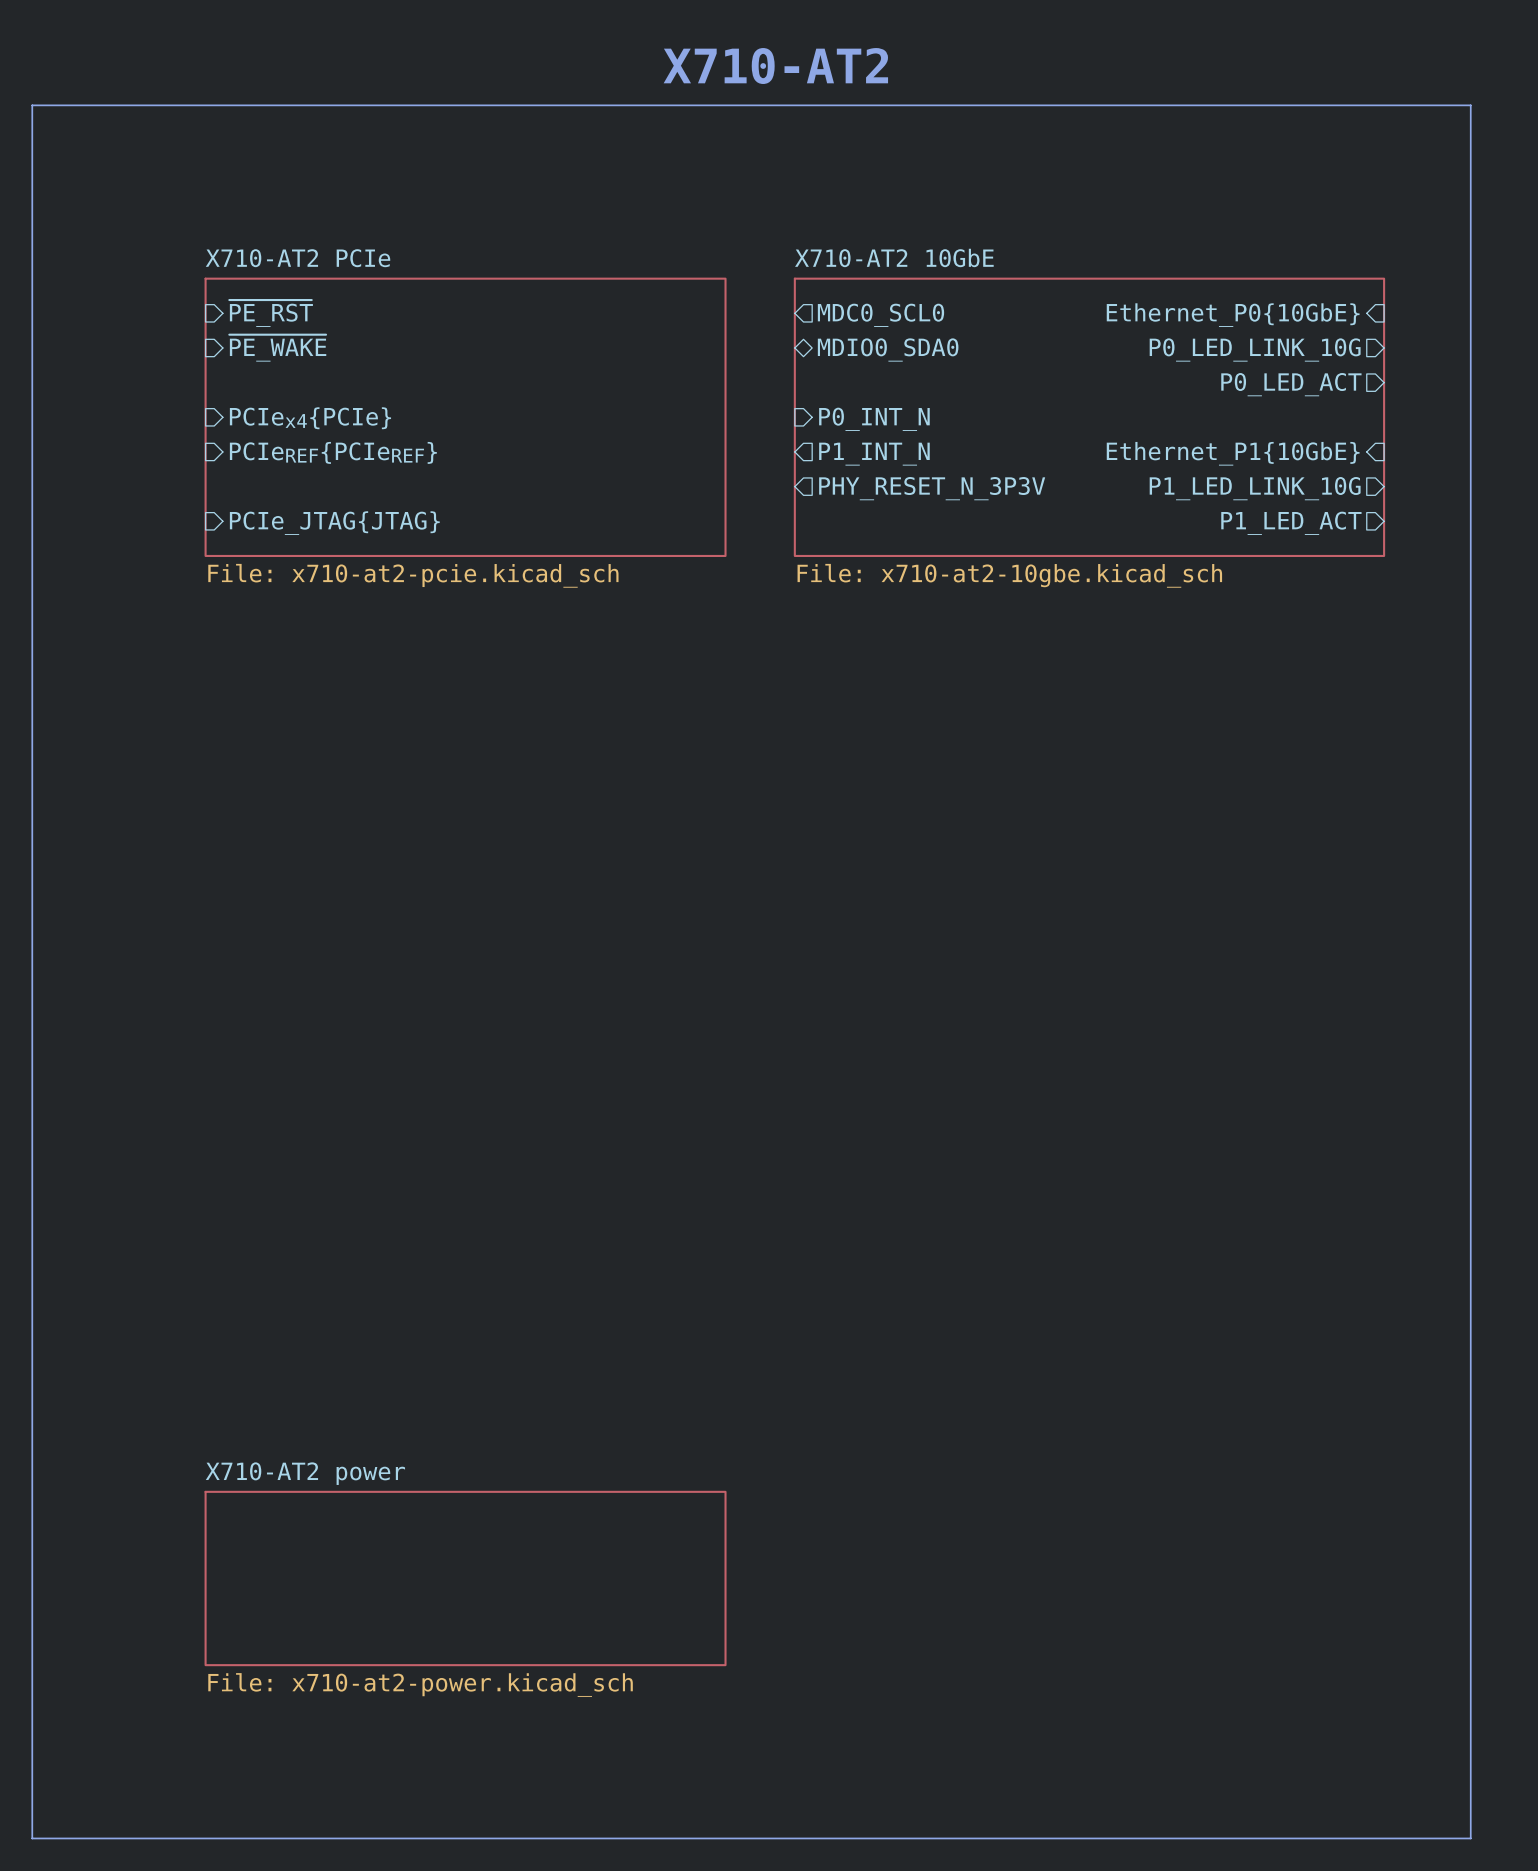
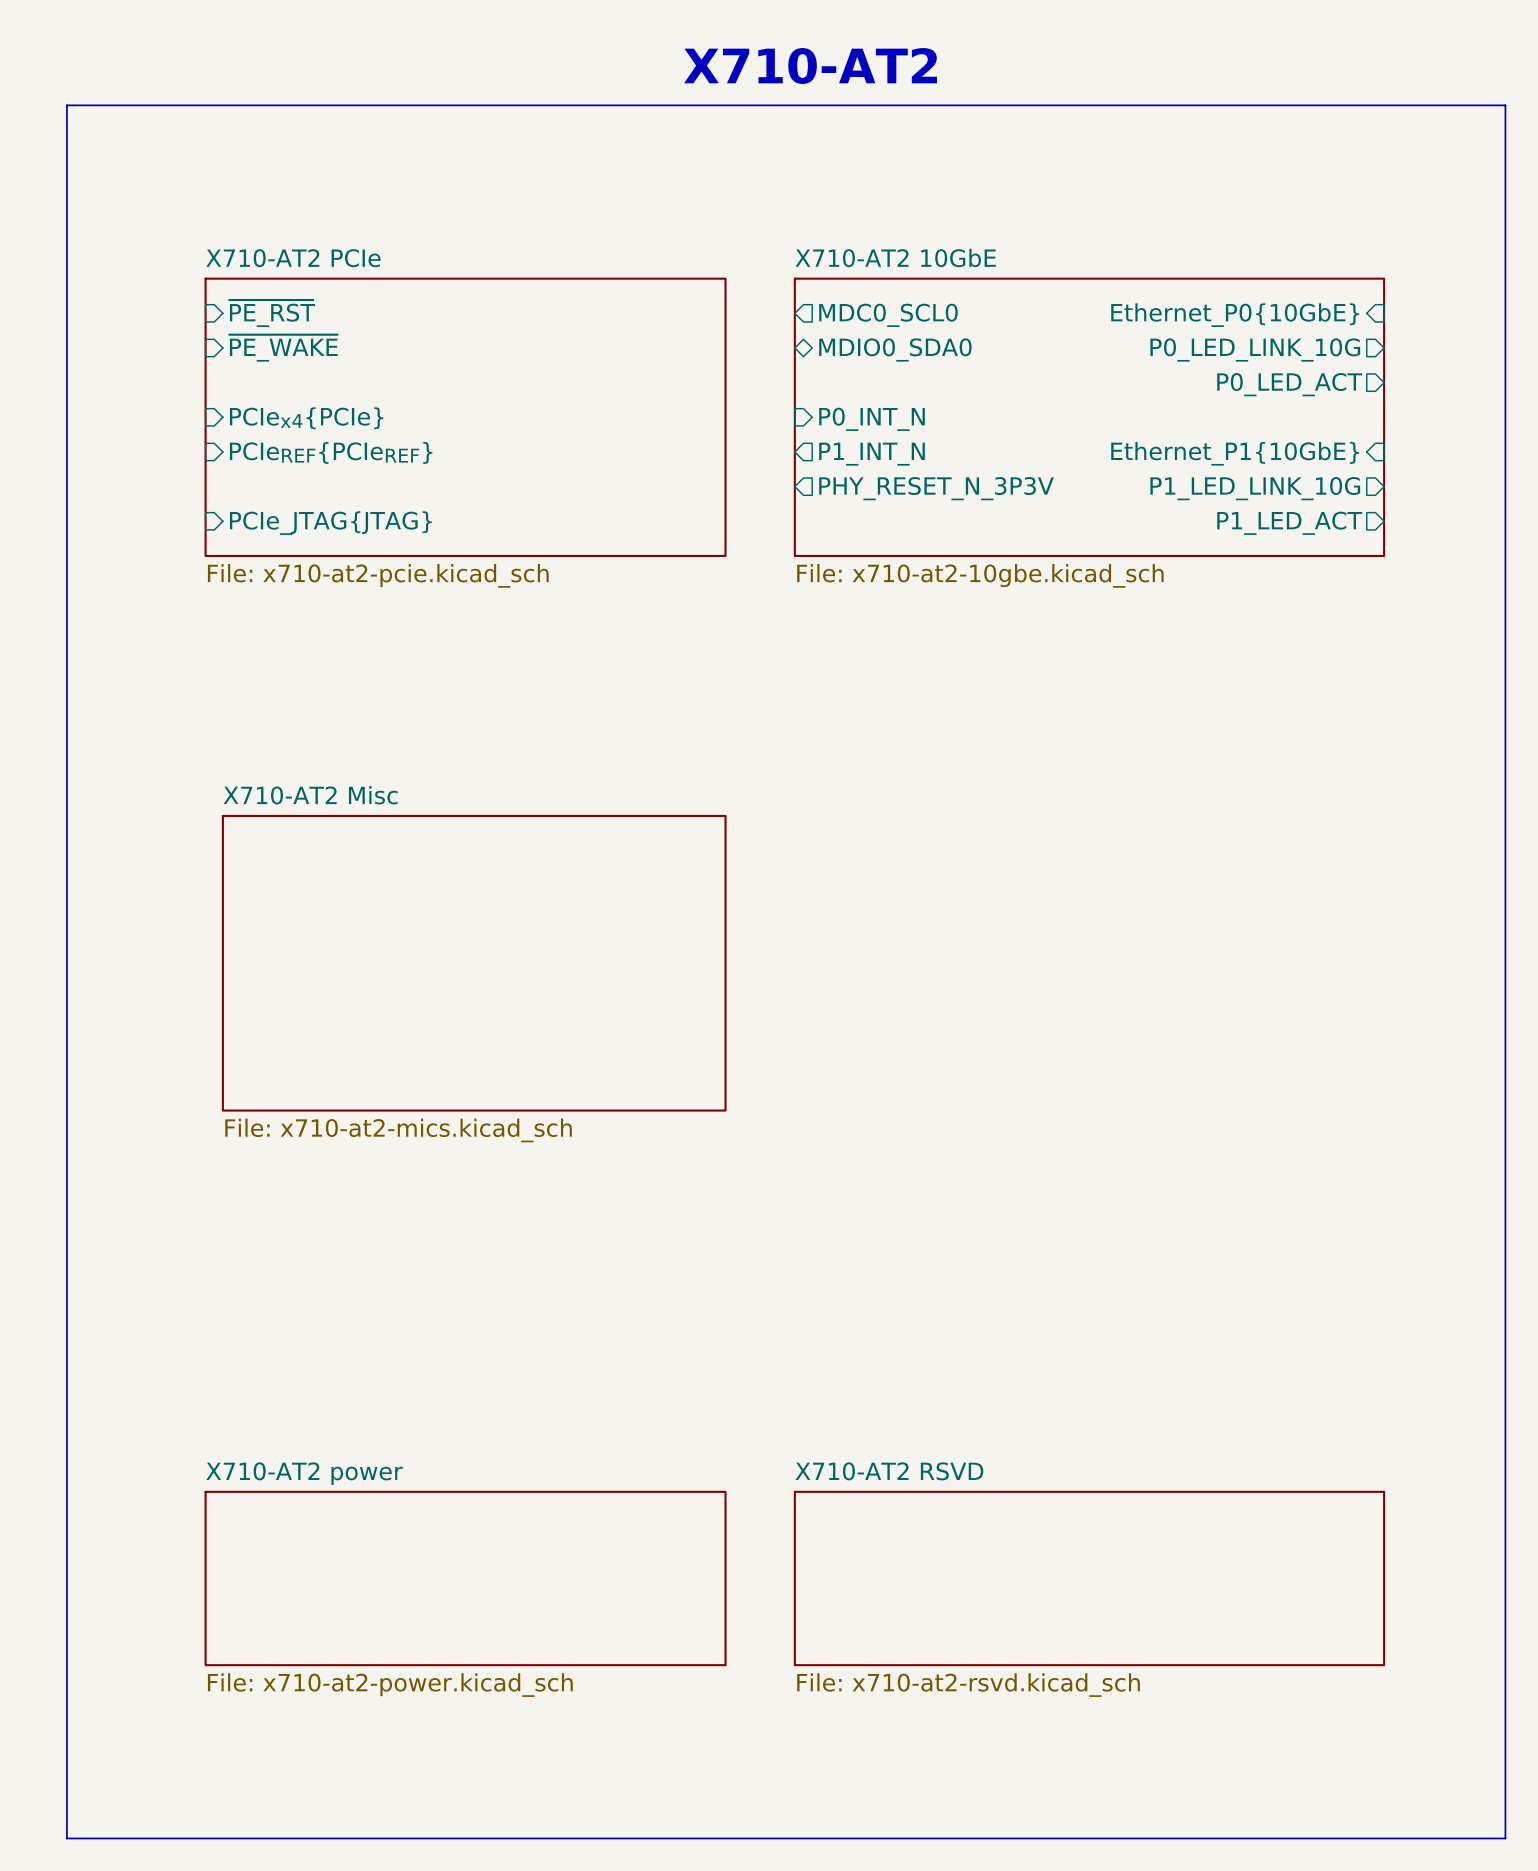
text position: X710-AT2 (775, 66) -> X710-AT2 (810, 66)
line: (66, 105) (32, 105) (32, 1838) (66, 1838) -> (66, 105) (66, 1838)
line: (1470, 105) (1470, 1838) -> (1470, 105) (1505, 105) (1505, 1838) (1470, 1838)
sheet X710-AT2 Misc: none -> File: x710-at2-mics.kicad_sch (474, 963)
sheet X710-AT2 RSVD: none -> File: x710-at2-rsvd.kicad_sch (1089, 1578)

